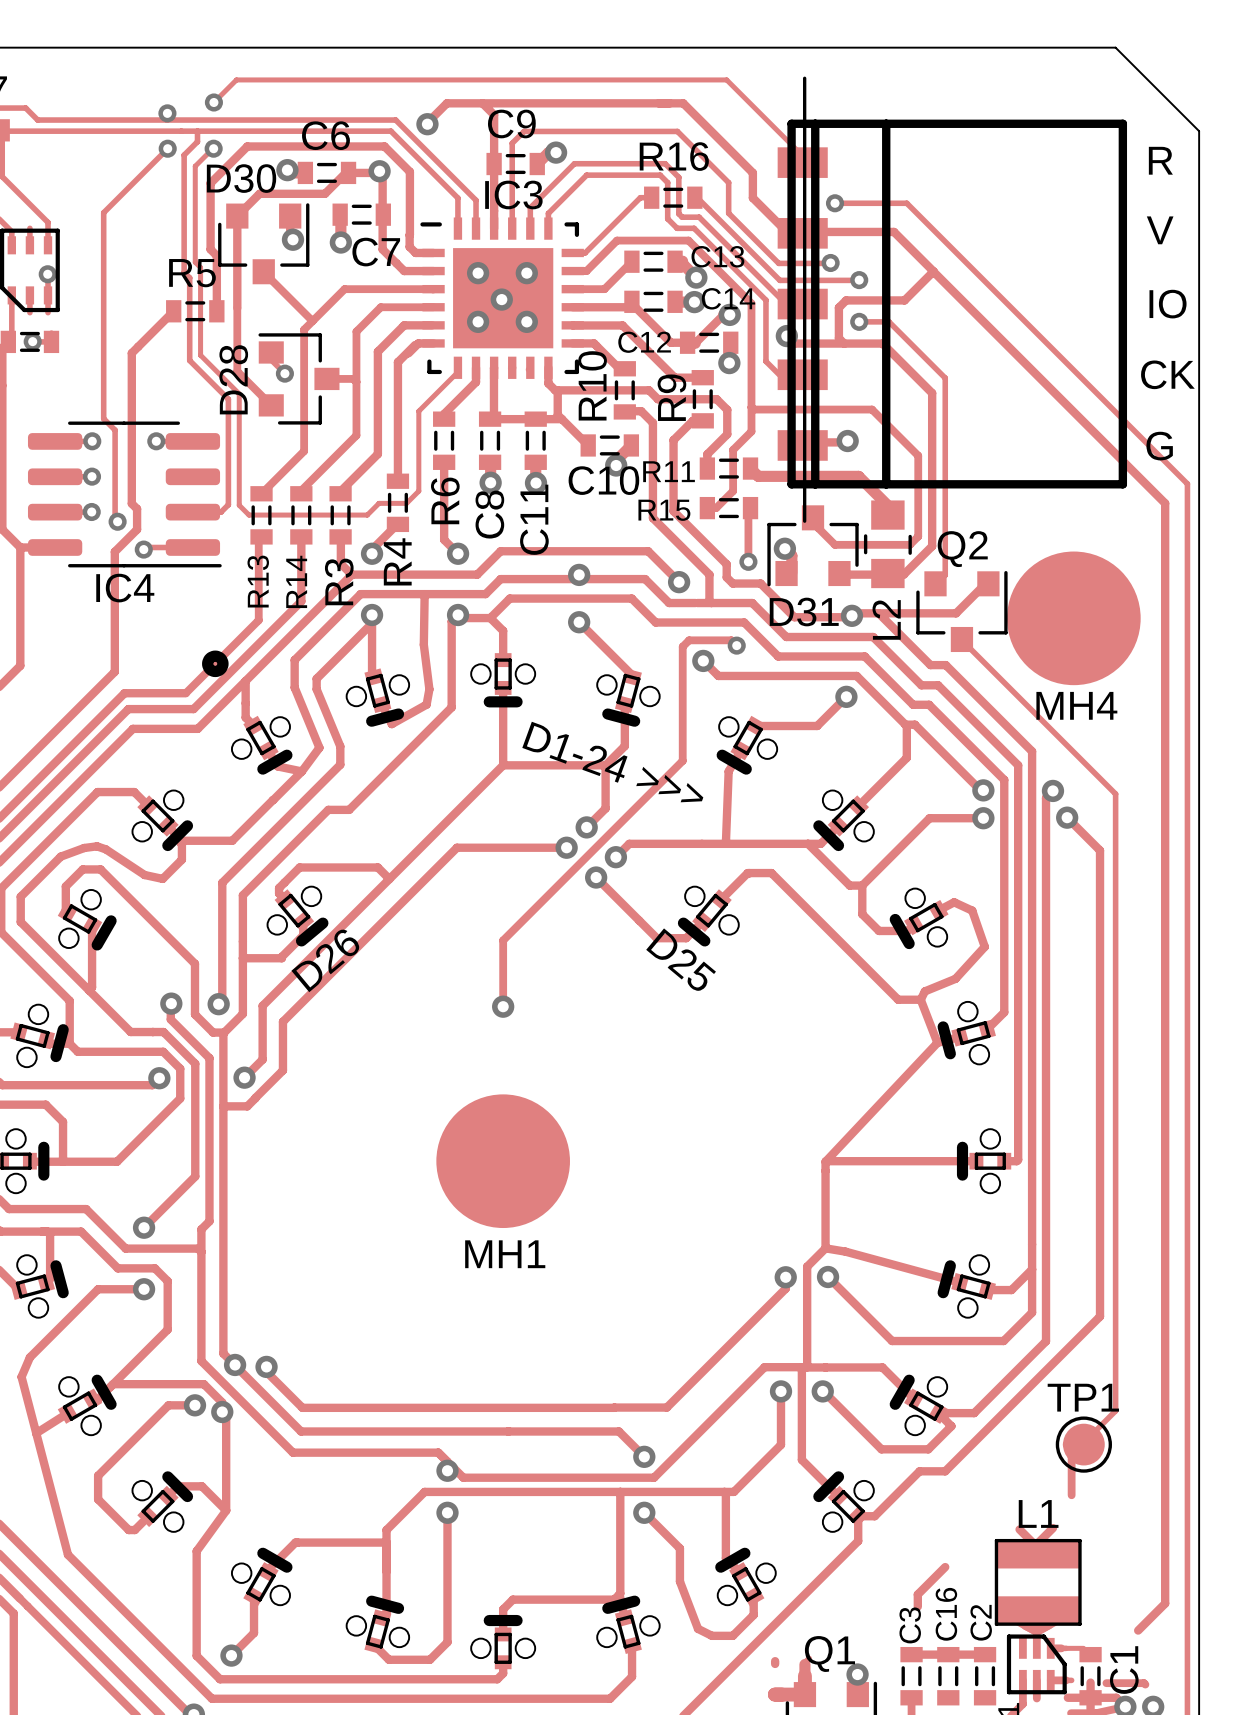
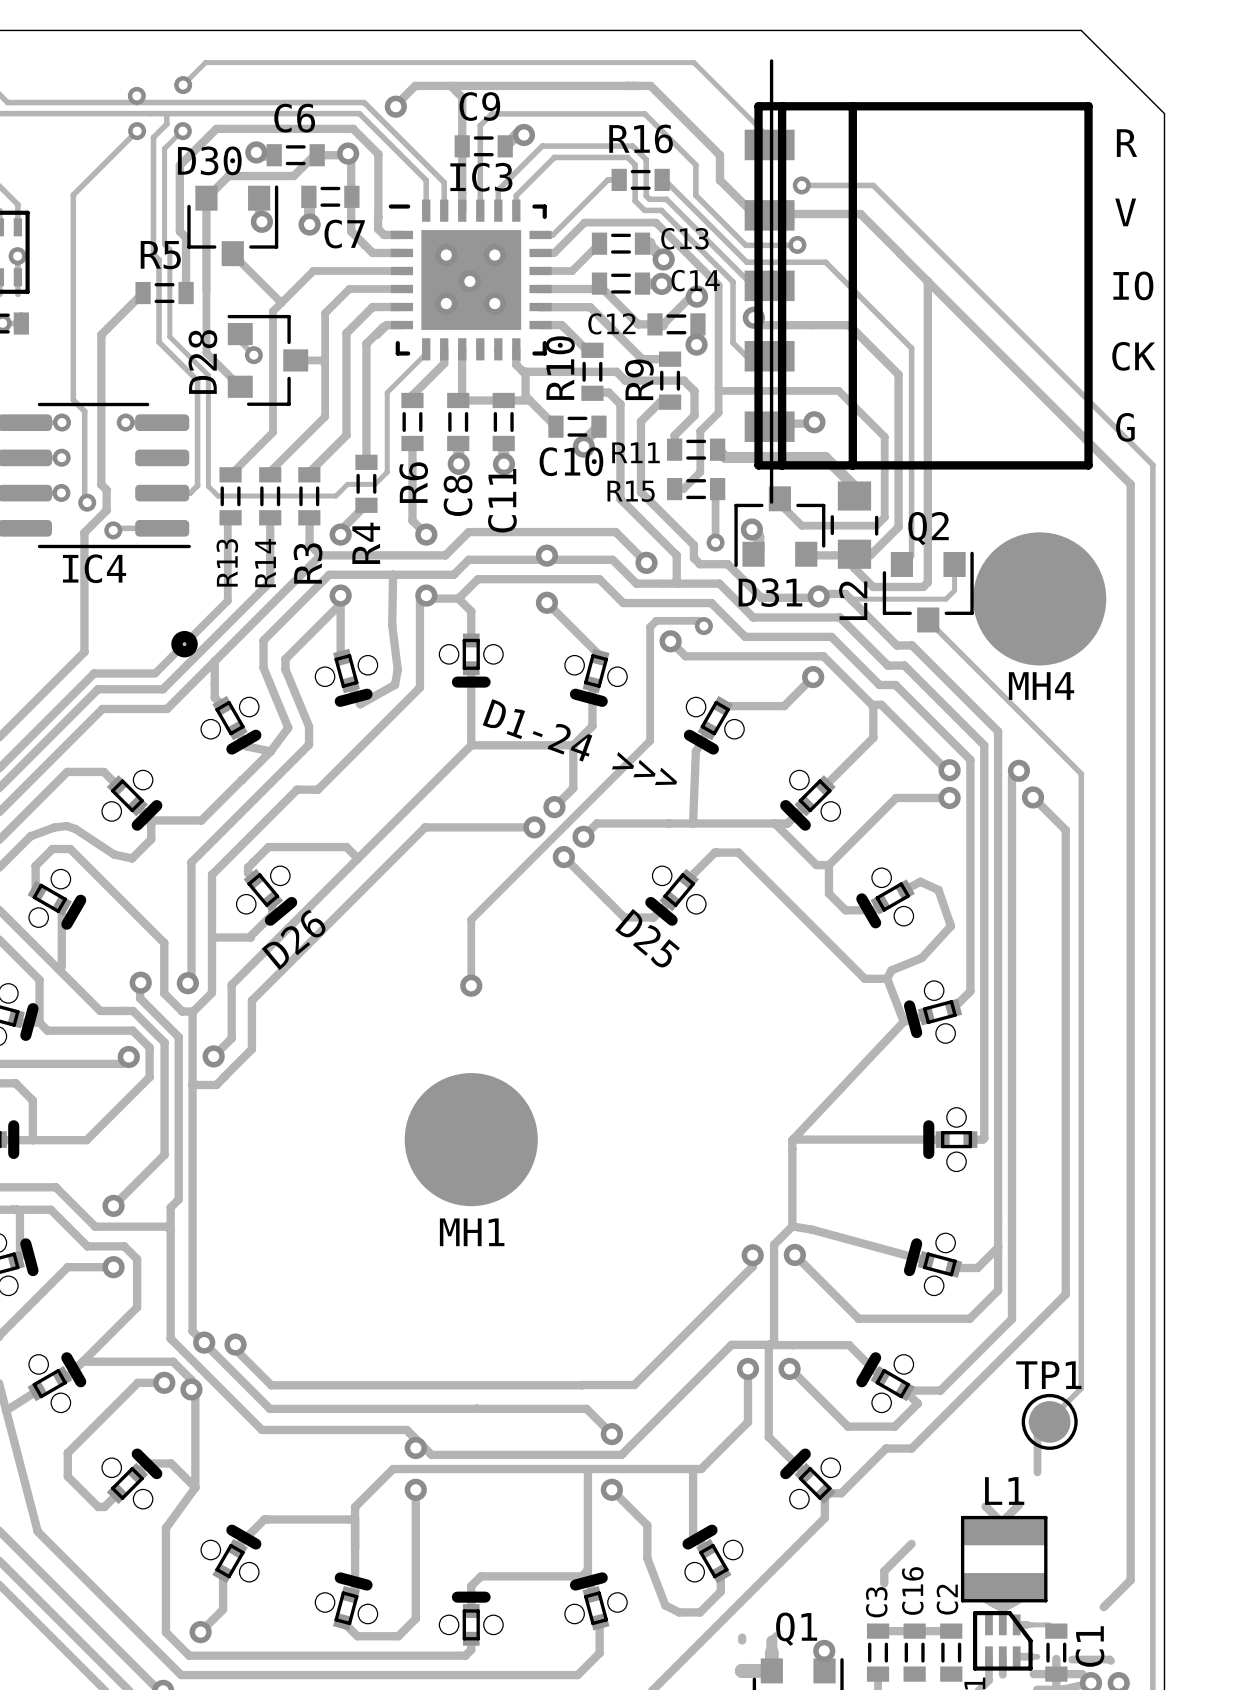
track: (933, 271) (904, 300) (846, 300) (838, 307) (838, 338) (844, 343) -> none
via: (859, 280) -> none
track: none -> (927, 281) (927, 582) (923, 586) (873, 586) (854, 568) (854, 554)
track: (859, 321) (889, 321) (945, 378) -> (825, 262) (911, 348) (911, 359)
via: (859, 321) -> none
track: (986, 582) (956, 613) (878, 613) -> none
track: none -> (954, 564) (954, 590) (945, 599) (851, 600)

